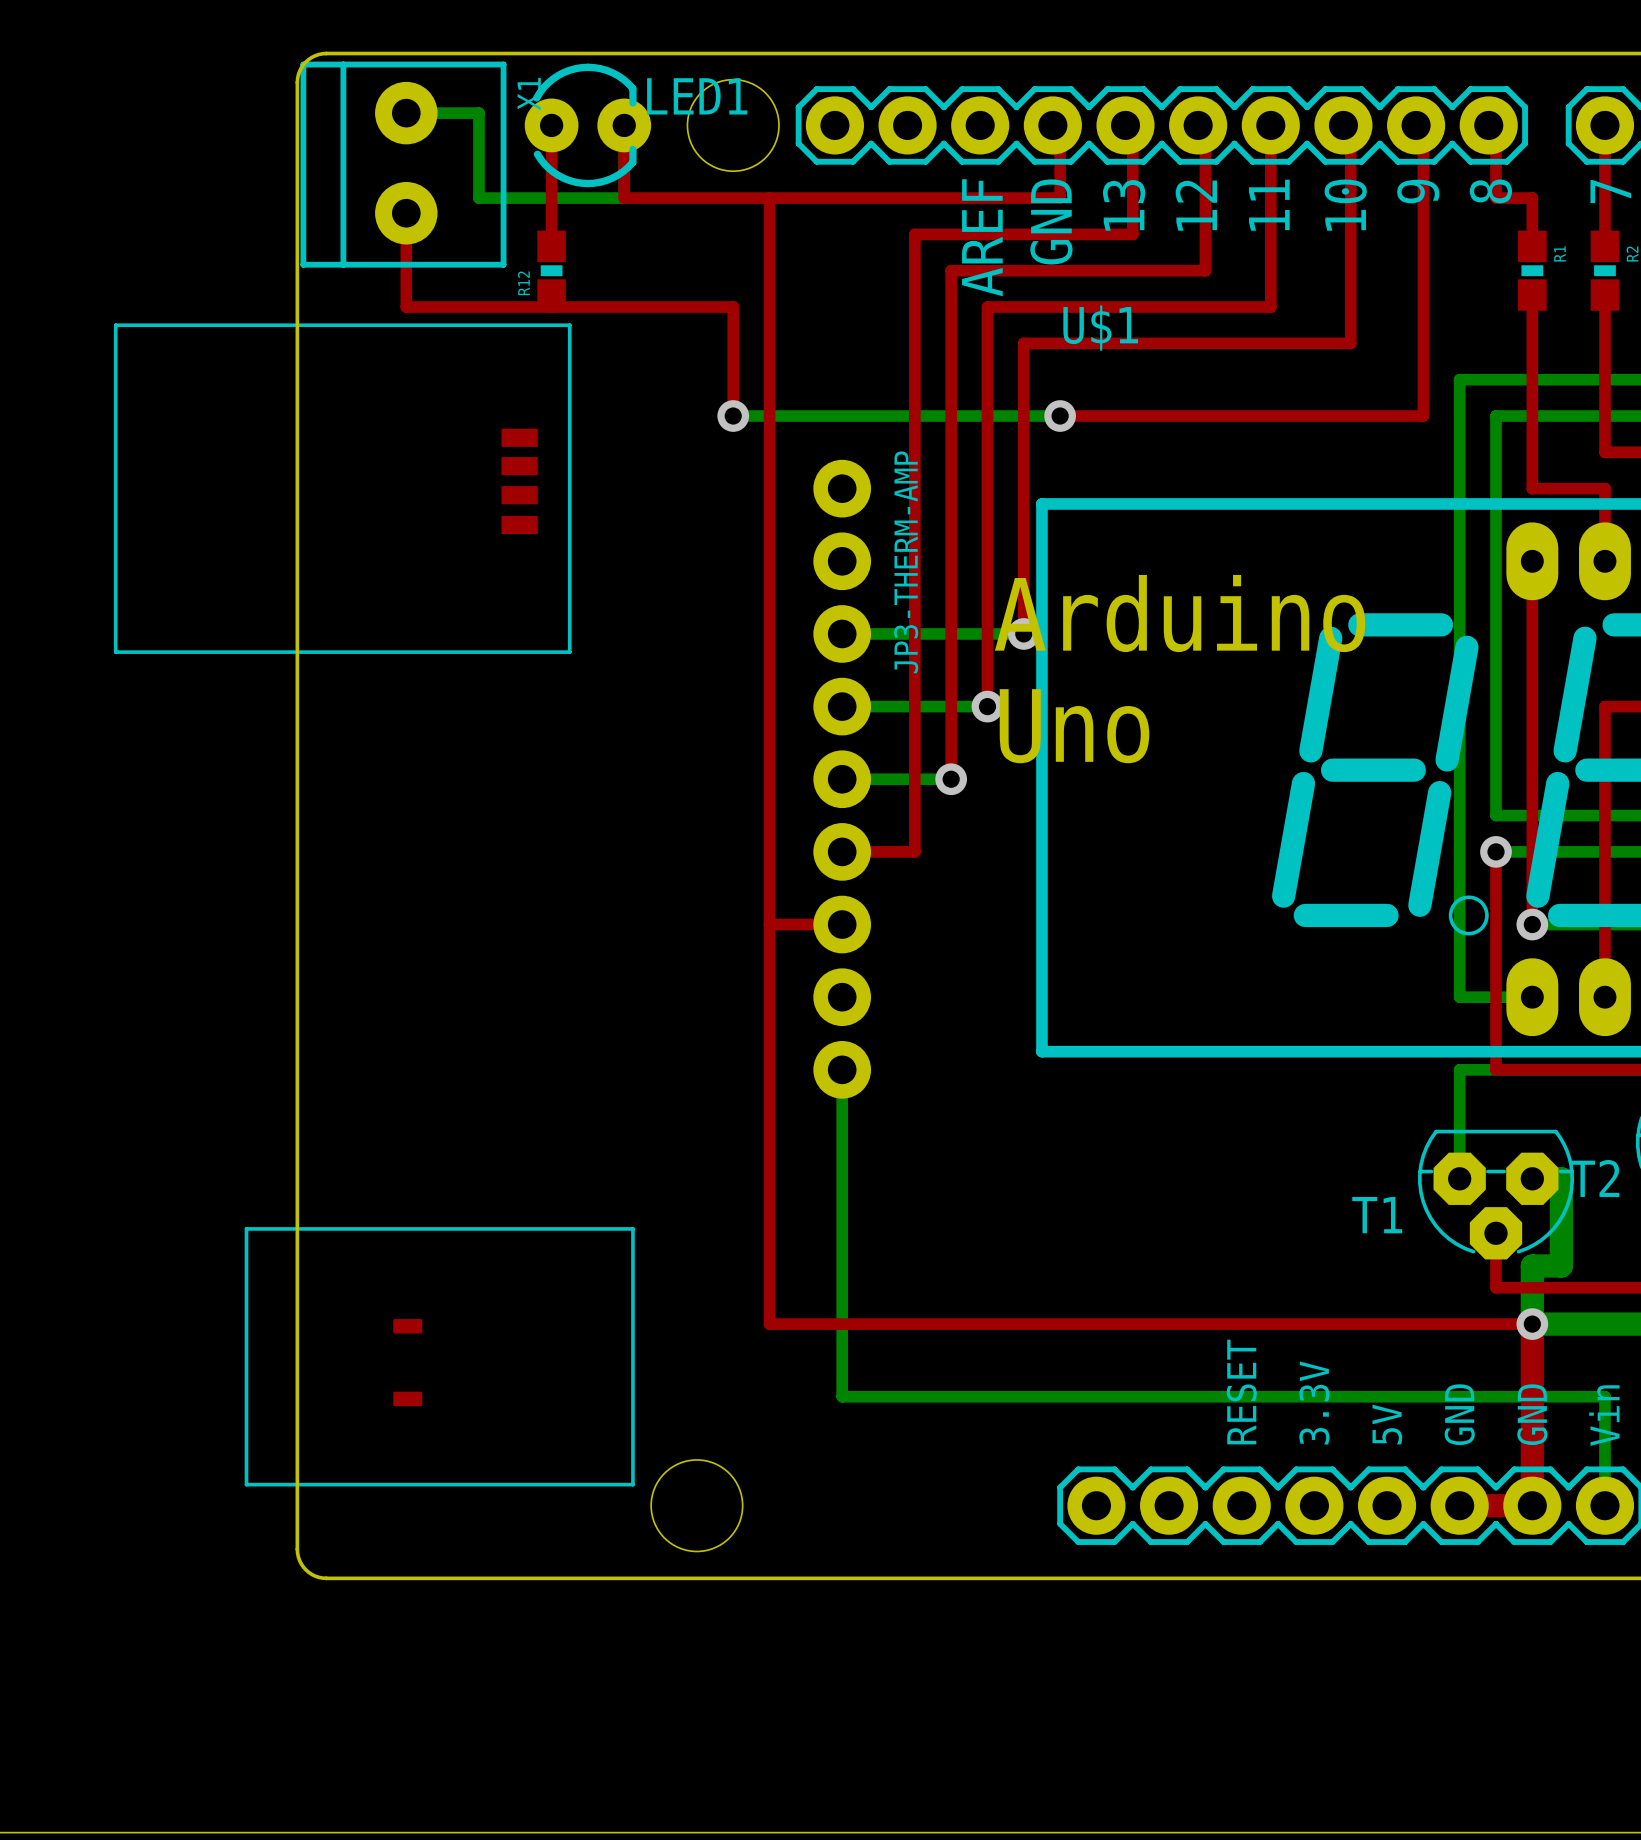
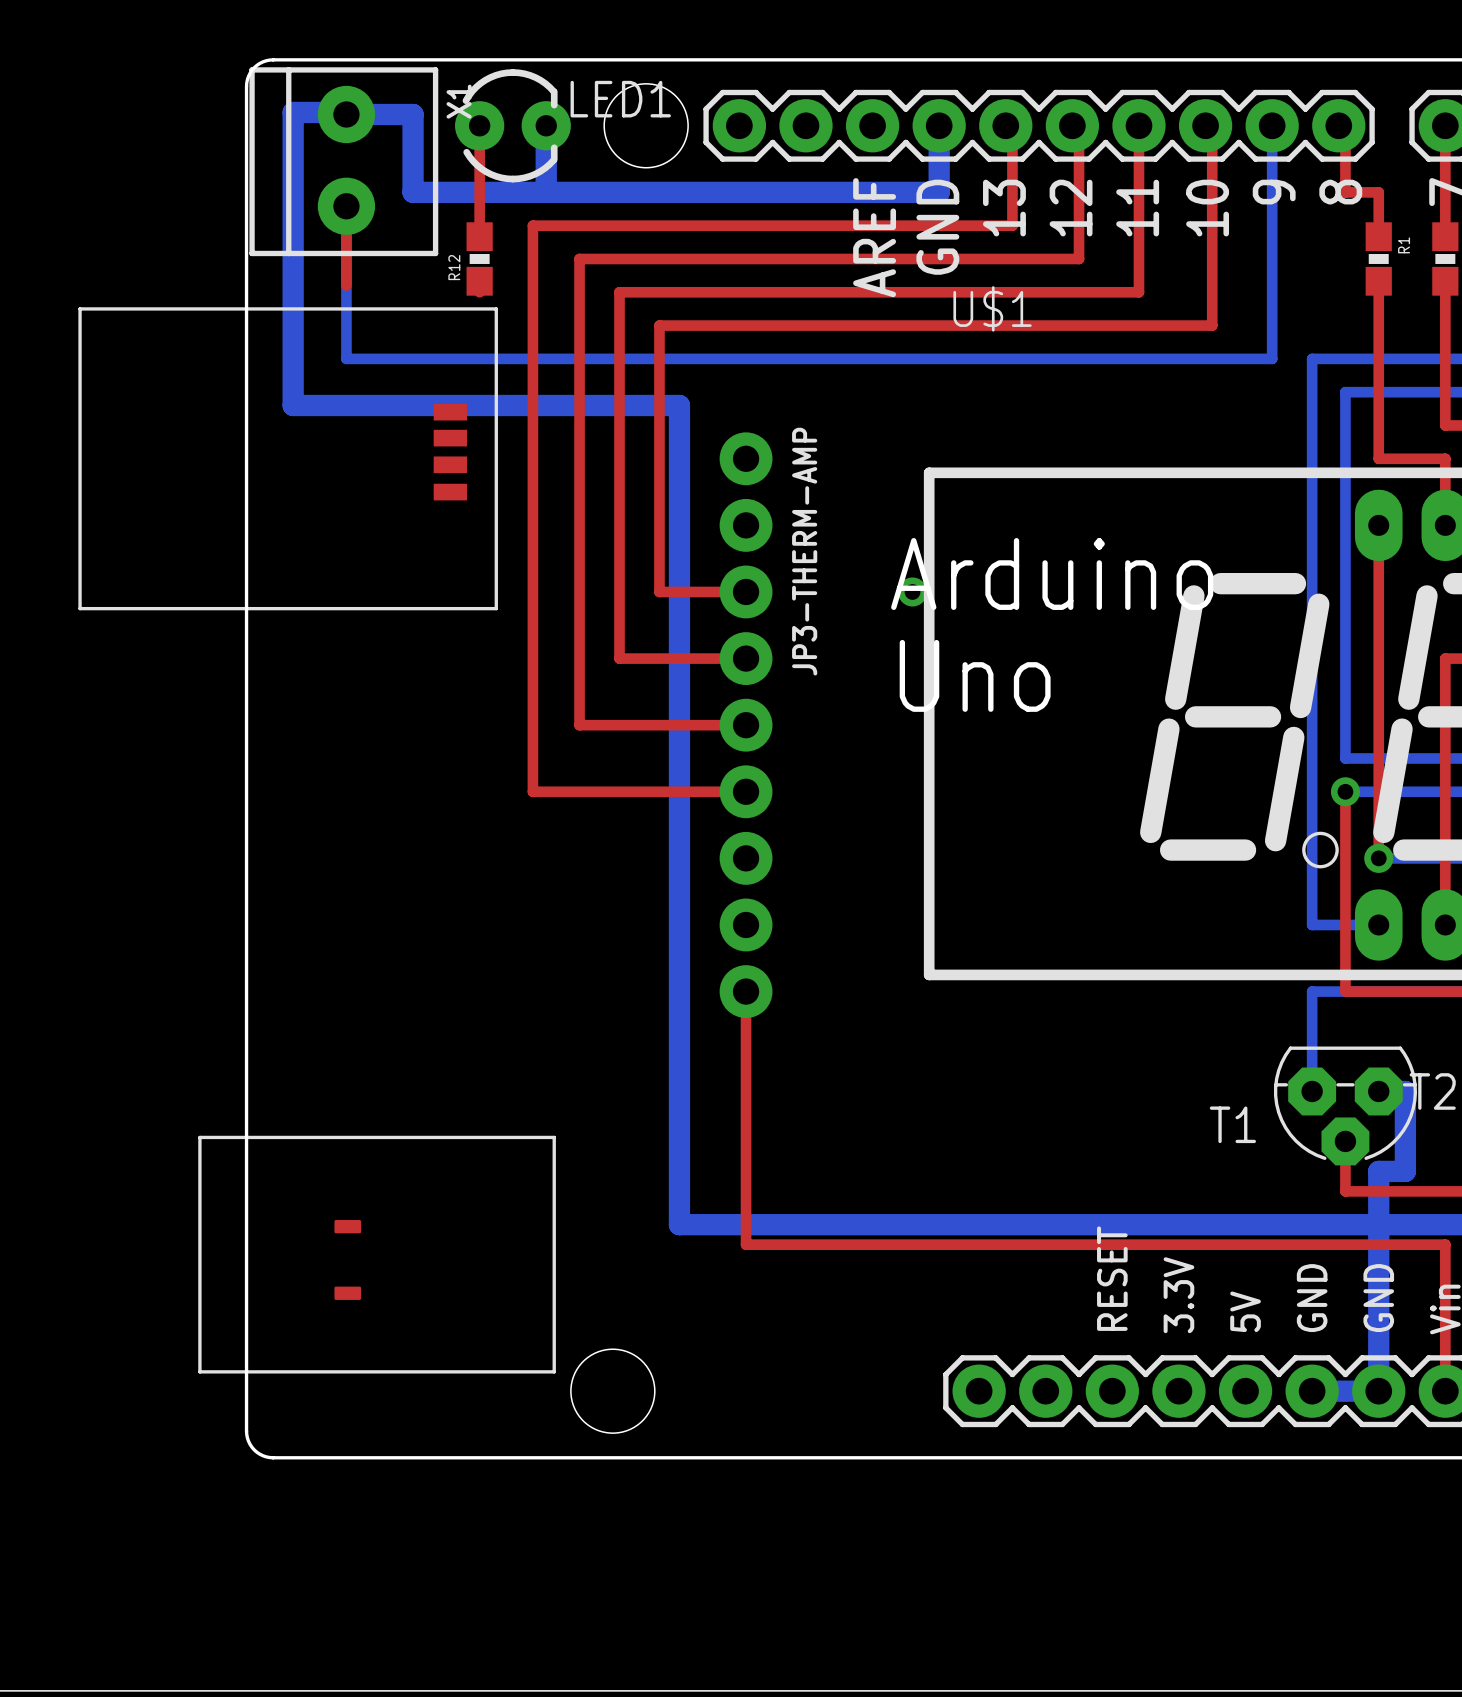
bottom track: none -> (346, 114) (346, 112) (293, 112) (293, 405) (679, 405) (679, 1224) (1378, 1224) (1378, 1391) (1312, 1391) (1312, 1397)
bottom track width: thin (406, 113) (478, 113) (478, 198) (624, 198) (624, 125) -> thick (346, 114) (413, 114) (413, 192) (546, 192) (546, 125)
top track: (624, 125) (624, 198) (1060, 198) (1060, 125) (1052, 125) -> none
bottom track: none -> (945, 125) (939, 125) (939, 192) (546, 192)
top track: (1416, 125) (1423, 125) (1423, 416) (1060, 416) -> none
bottom track: none -> (1272, 125) (1272, 358) (346, 358) (346, 206)
top track: (769, 198) (769, 1324) (1532, 1324) (1532, 1505) (1459, 1505) -> none
top track: (914, 234) (914, 851) (842, 851) -> (812, 225) (532, 225) (532, 791) (746, 791)
top track: (951, 270) (951, 779) -> (845, 258) (579, 258) (579, 725) (746, 725)
top track: (406, 299) (406, 307) (704, 307) -> (746, 658) (619, 658) (619, 292)
top track: (733, 307) (733, 416) -> (646, 292) (879, 292)
top track: (987, 307) (987, 706) -> none
top track: (1023, 343) (1023, 633) -> (912, 325) (659, 325) (659, 591) (746, 591)
bottom track: (733, 416) (1060, 416) -> none
via: (733, 416) -> none
via: (1060, 416) -> none
bottom track: (842, 633) (1023, 633) -> none
bottom track: (842, 706) (987, 706) -> none
via: (987, 706) -> none
bottom track: (842, 779) (951, 779) -> none
via: (951, 779) -> none
top track: (769, 924) (842, 924) -> none
top track: none -> (746, 991) (746, 1244) (1445, 1244) (1445, 1391)
bottom track: (842, 1069) (842, 1396) (1604, 1396) (1604, 1505) -> none
via: (1532, 1324) -> none

